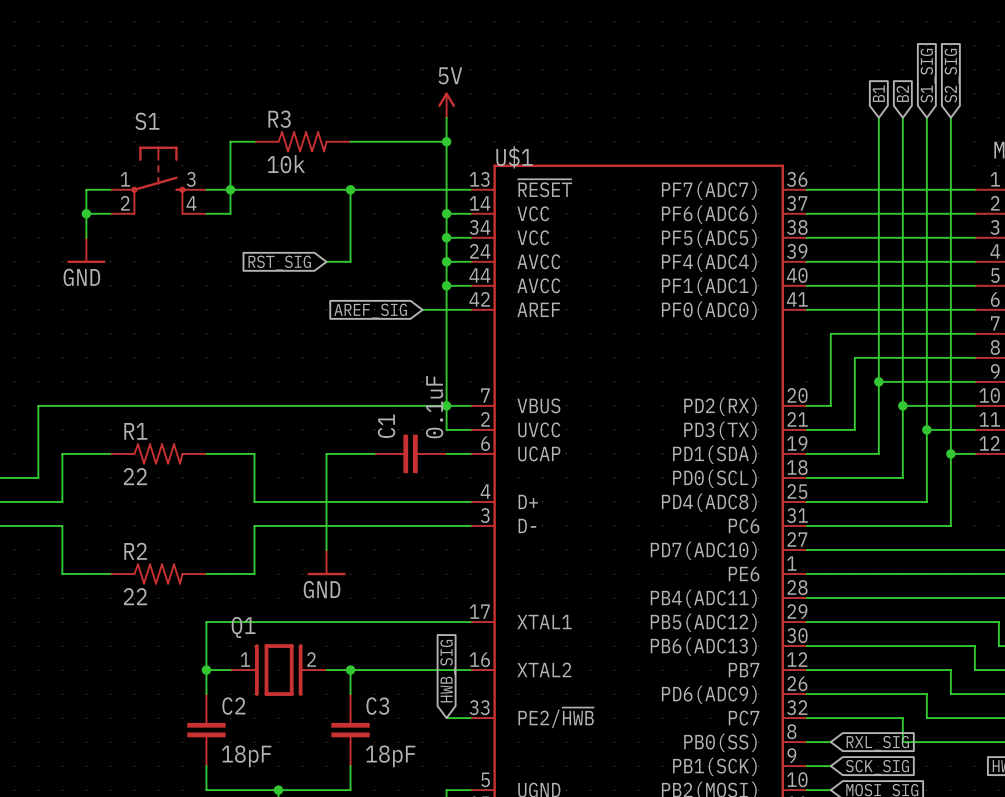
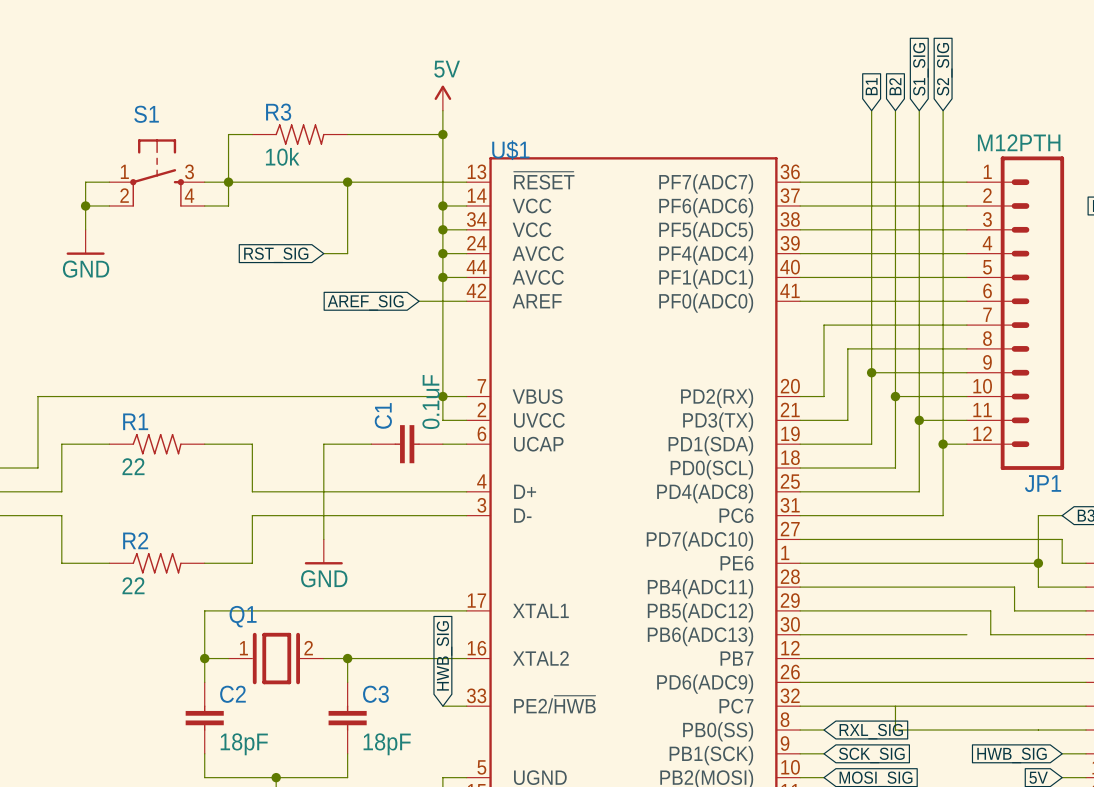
wire: (974, 646) (974, 670) -> (943, 658) (966, 658)
wire: (950, 670) (950, 694) -> (919, 682) (943, 682)
wire: (926, 694) (926, 718) -> (895, 706) (919, 706)

